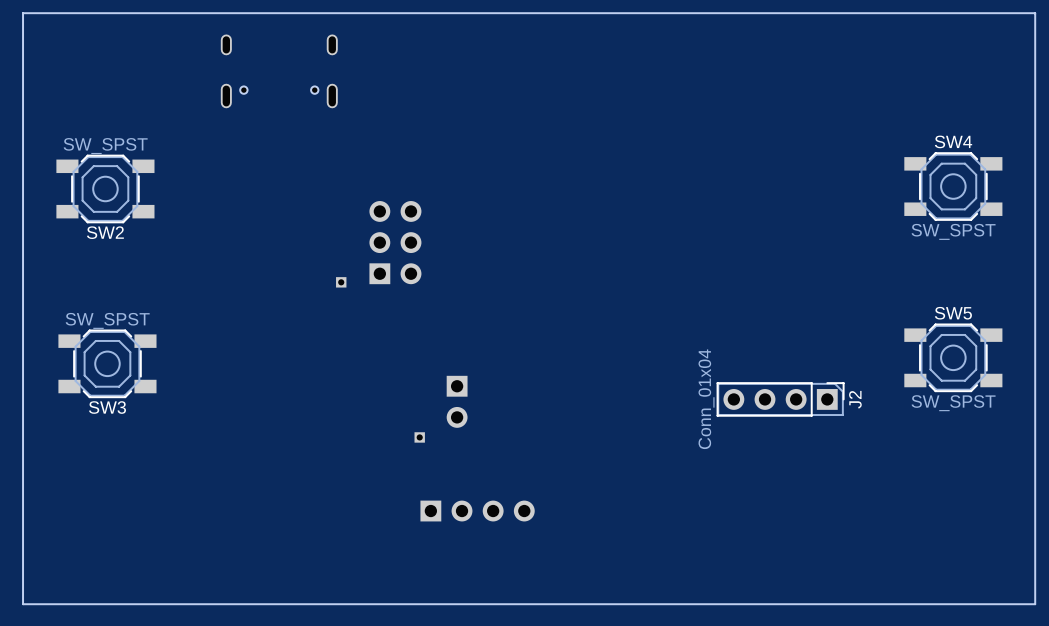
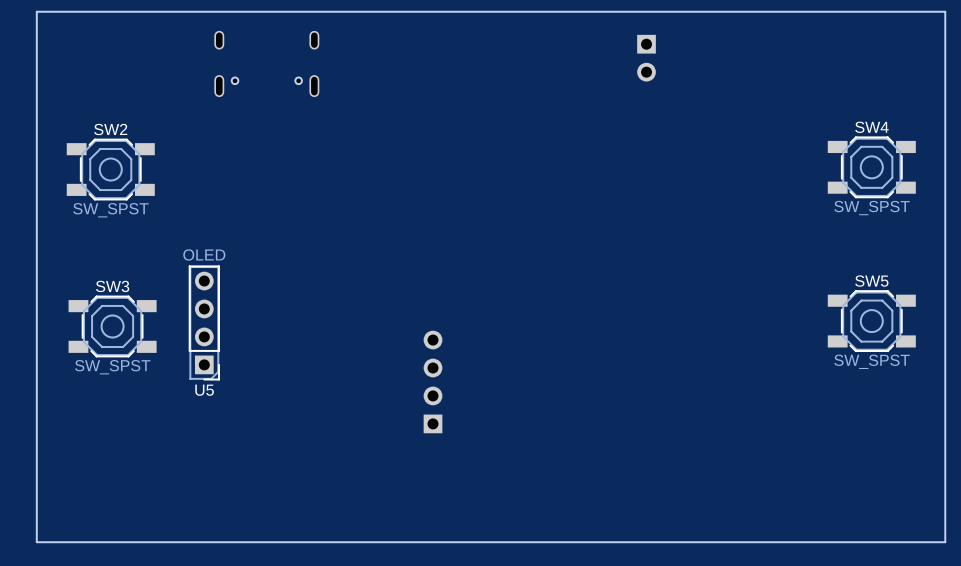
part: none -> (646, 58)
SW2 value position: SW_SPST (105, 146) -> SW_SPST (110, 210)
SW2 name position: SW2 (105, 232) -> SW2 (110, 129)
part: (395, 242) -> none
part: (341, 282) -> none
SW3 value position: SW_SPST (107, 320) -> SW_SPST (112, 367)
U5: none -> OLED (204, 322)
J2: Conn_01x04 (780, 399) -> none
part: (457, 401) -> none
SW3 name position: SW3 (107, 407) -> SW3 (112, 286)
part: (419, 437) -> none
part rotation: 0° (477, 511) -> 90° counterclockwise (433, 381)
part position: (477, 511) -> (433, 381)

